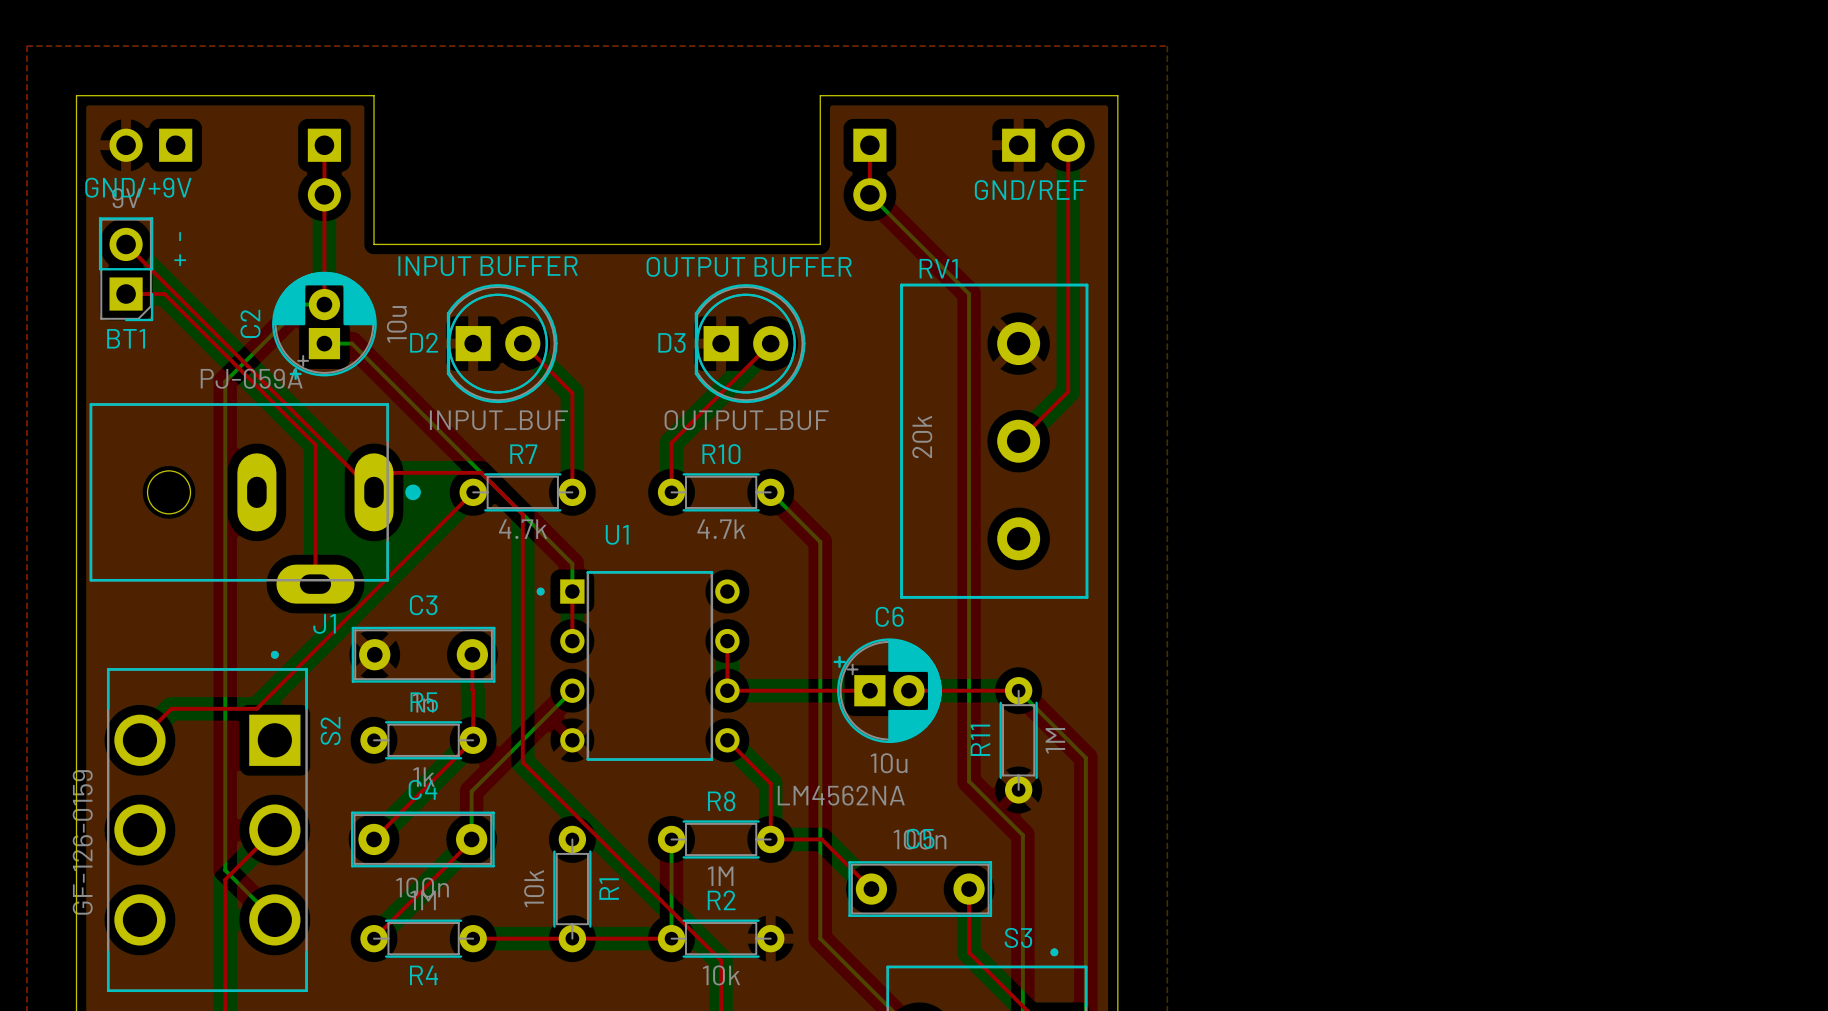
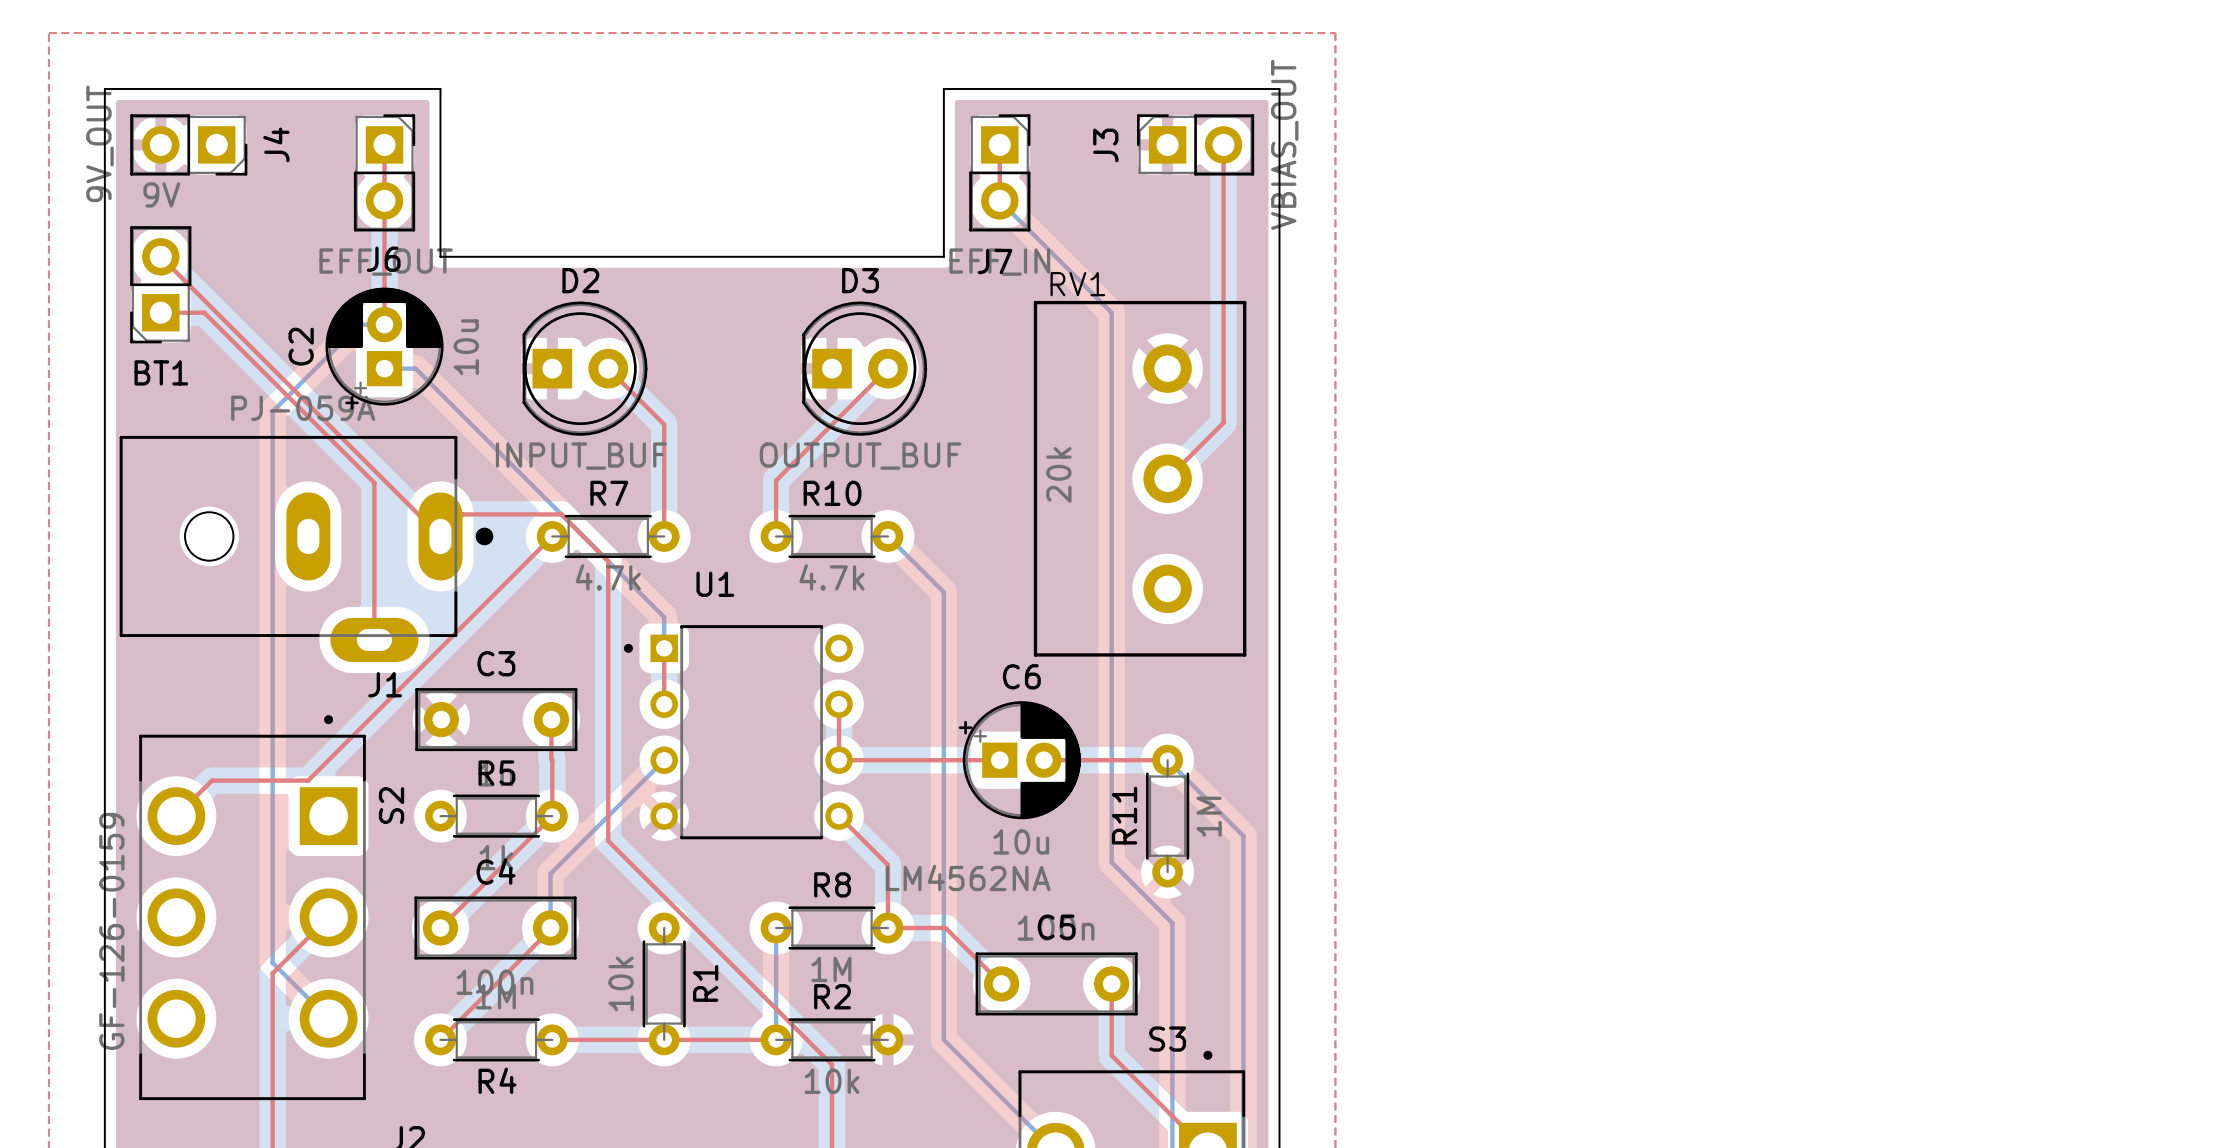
J4 side: bottom (150, 145) -> top (188, 144)
J3 side: bottom (1043, 145) -> top (1195, 144)
J6 side: bottom (324, 170) -> top (384, 172)
J7 side: bottom (869, 170) -> top (999, 172)
text: GND/+9V (138, 187) -> none
text: GND/REF (1030, 190) -> none
BT1 footprint: [98, 217, 154, 322] -> [130, 226, 192, 344]
text: - + (180, 249) -> none
text: INPUT BUFFER (488, 266) -> none
text: OUTPUT BUFFER (749, 266) -> none
D2 name position: D2 (424, 342) -> D2 (580, 280)
D3 name position: D3 (671, 342) -> D3 (860, 280)

